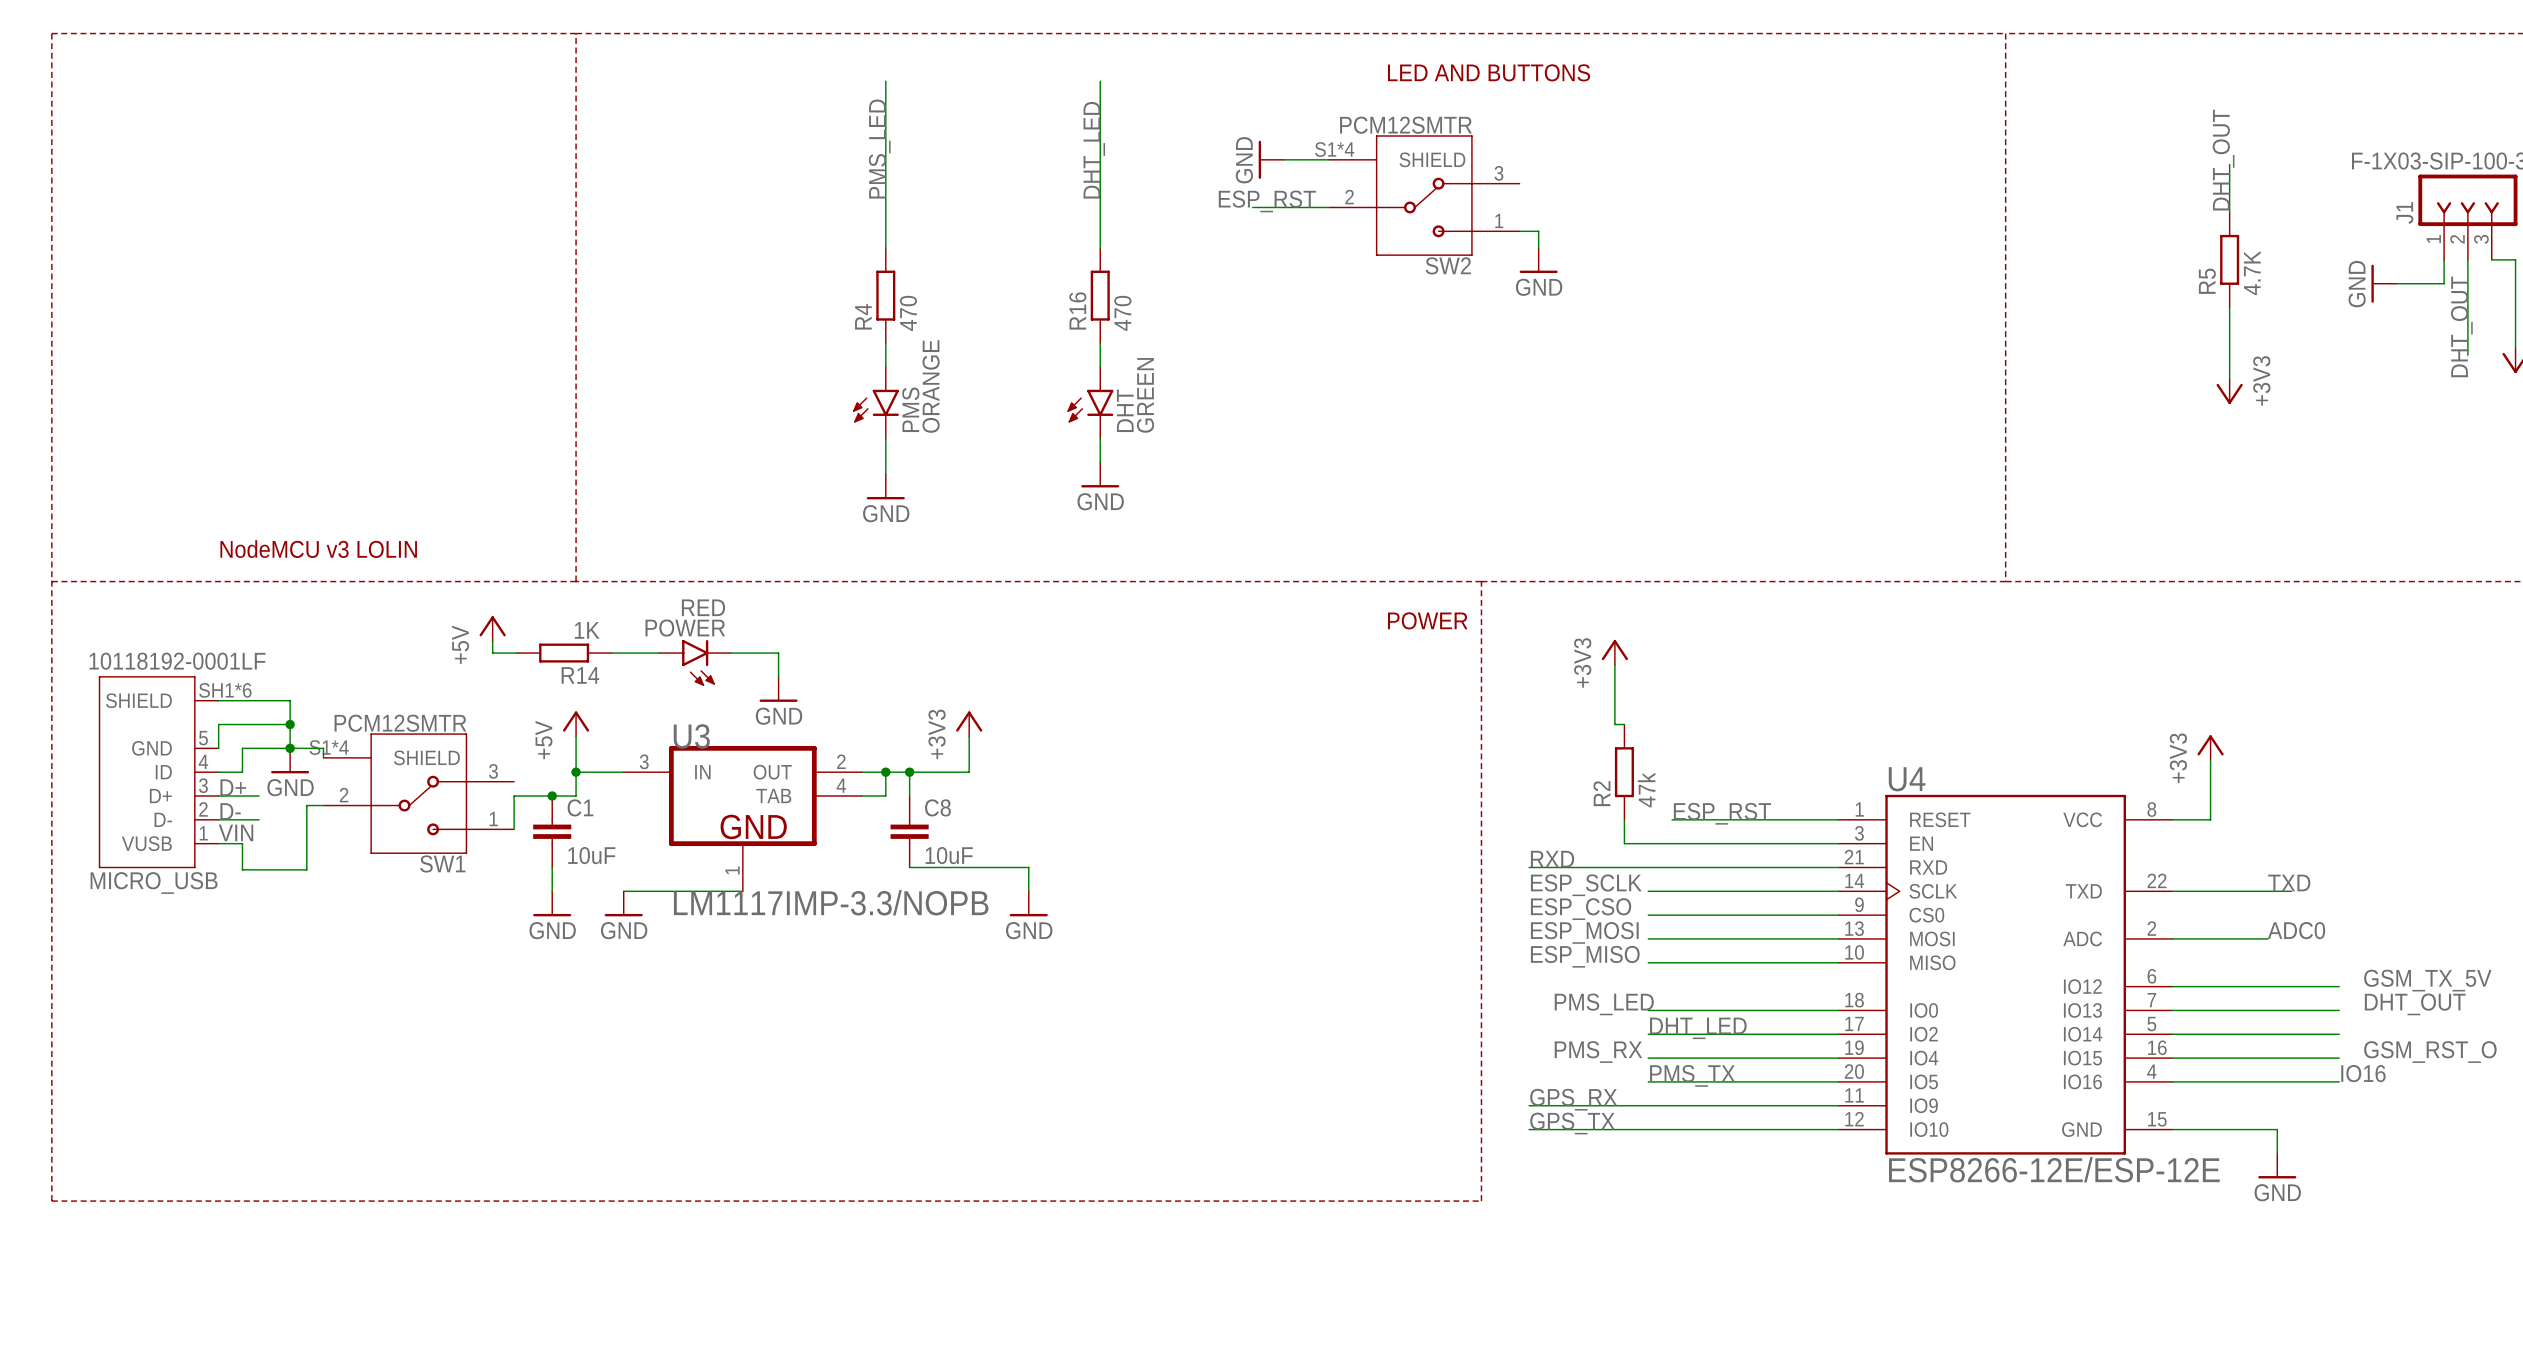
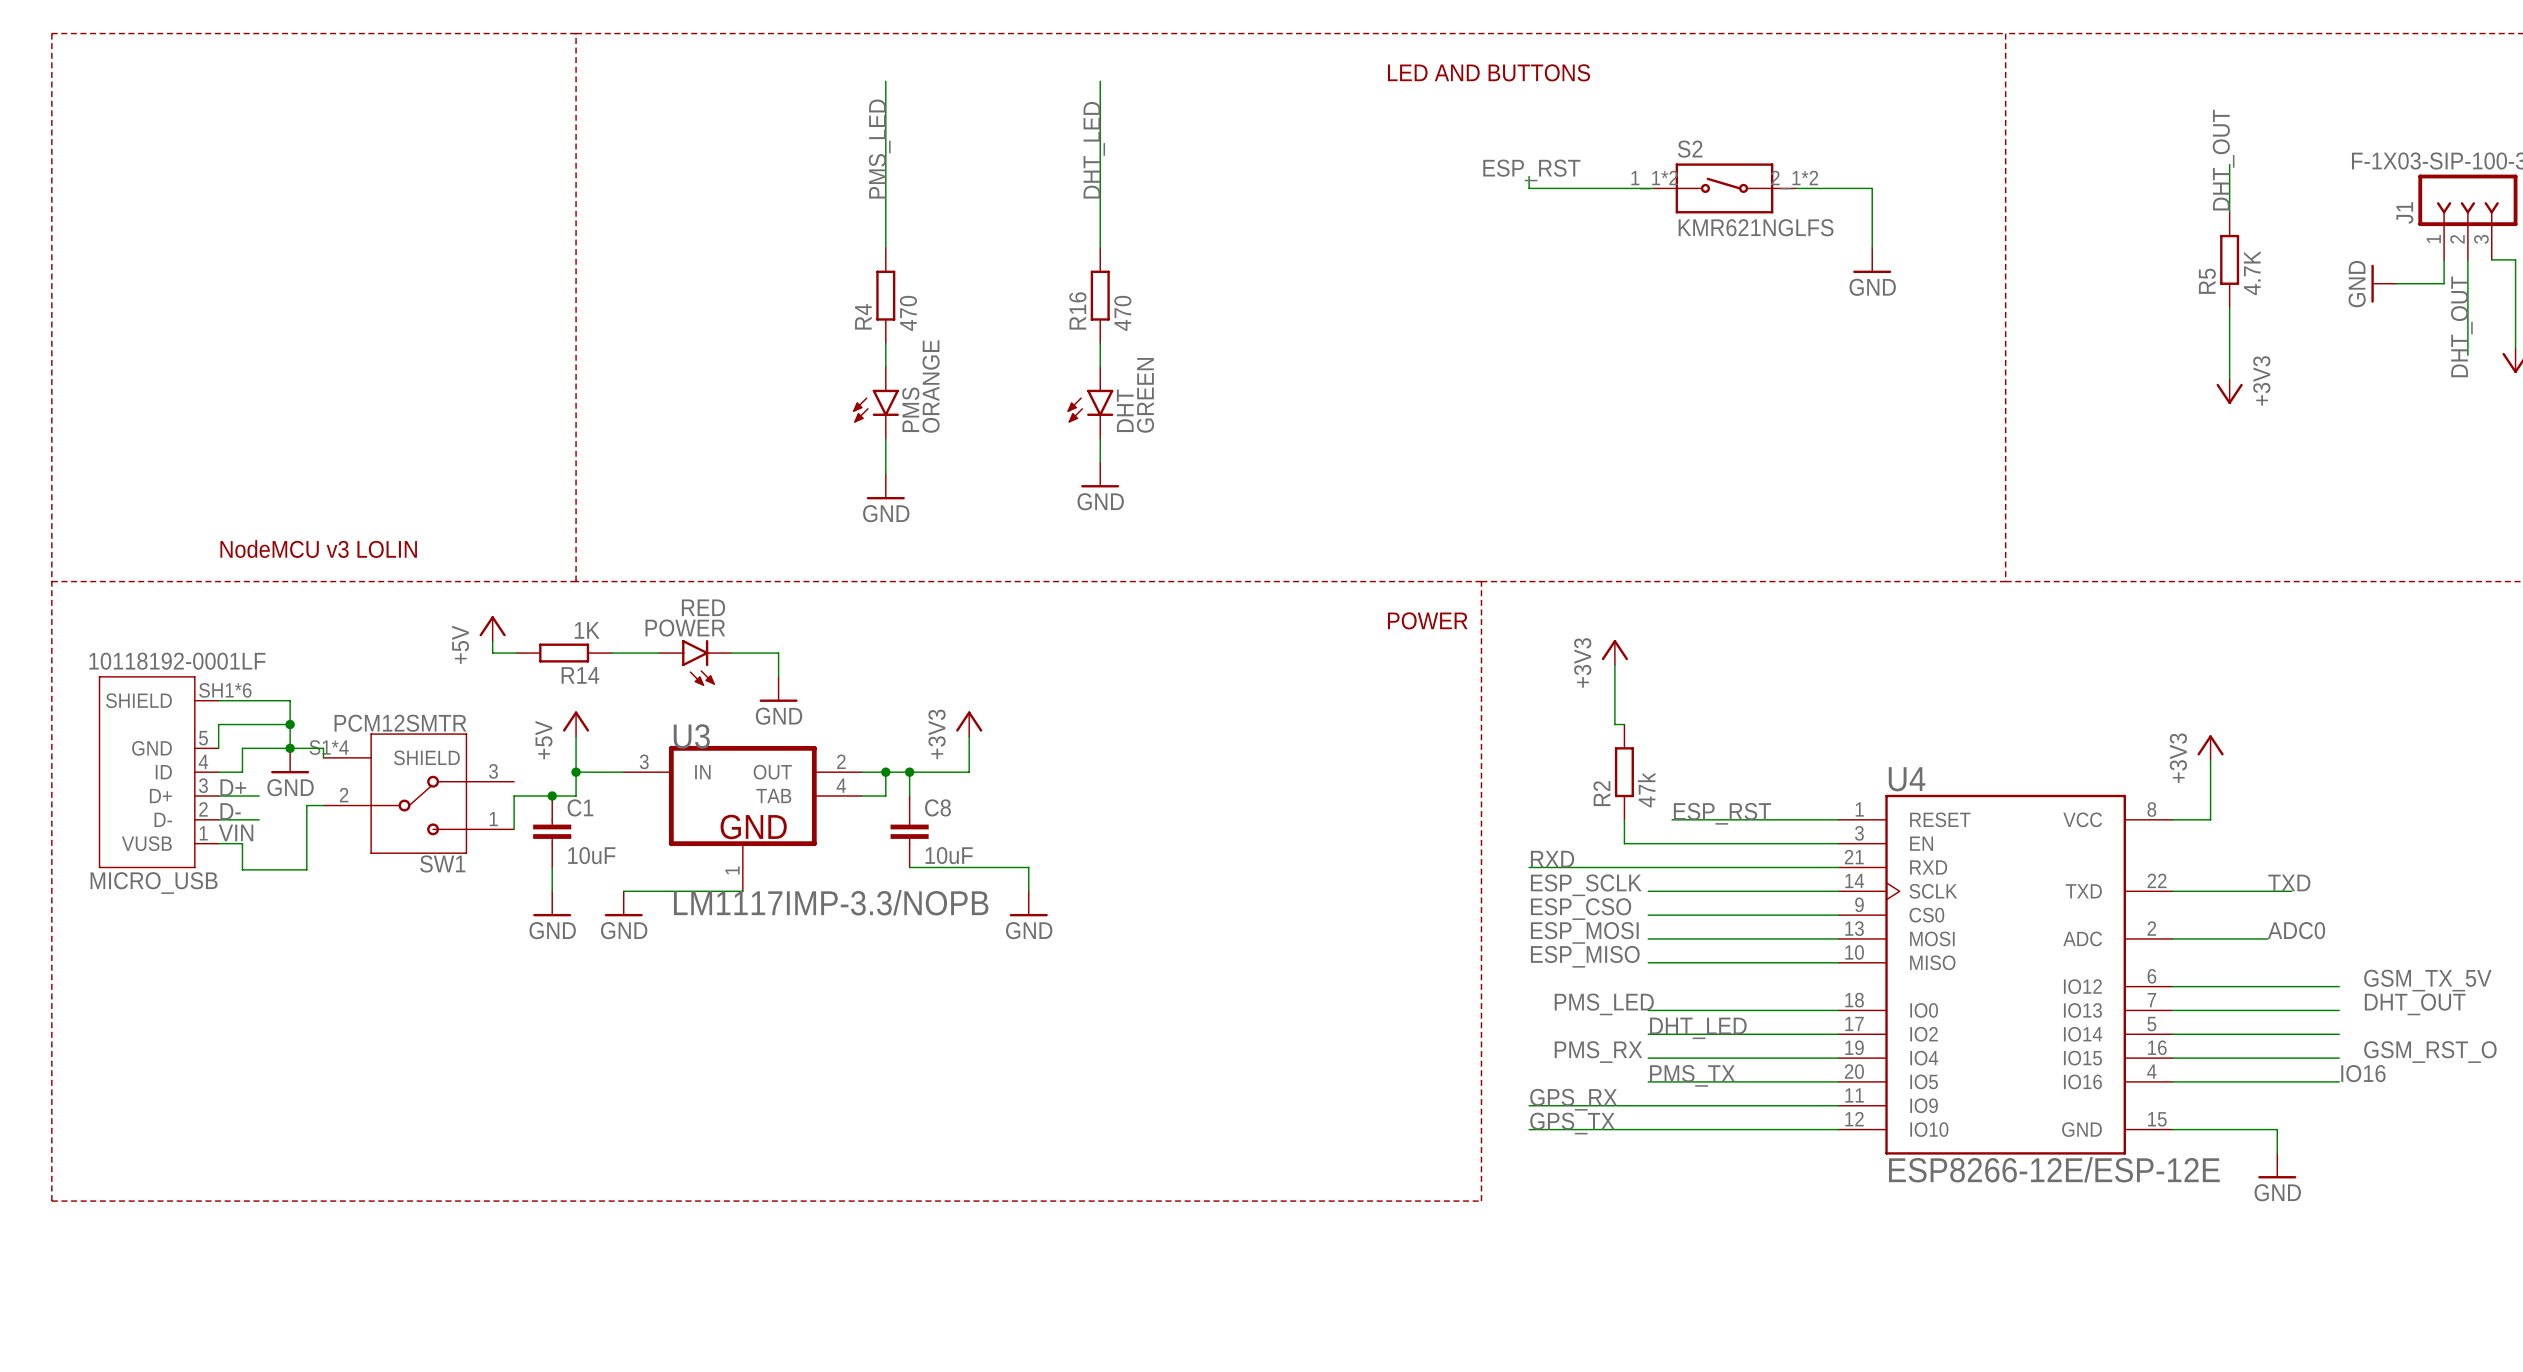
power symbol: GND (1271, 159) -> none
wire: (1283, 159) (1328, 159) -> none
label: none -> ESP_RST (1531, 170)
wire: none -> (1529, 176) (1529, 188) (1653, 188)
S2: none -> KMR621NGLFS (1724, 188)
wire: none -> (1795, 188) (1872, 188) (1872, 247)
SW2: PCM12SMTR (1424, 195) -> none
label: ESP_RST (1267, 201) -> none
wire: (1252, 207) (1328, 207) -> none
wire: (1519, 231) (1538, 231) (1538, 247) -> none
power symbol: GND (1538, 260) -> none
power symbol: none -> GND (1872, 260)

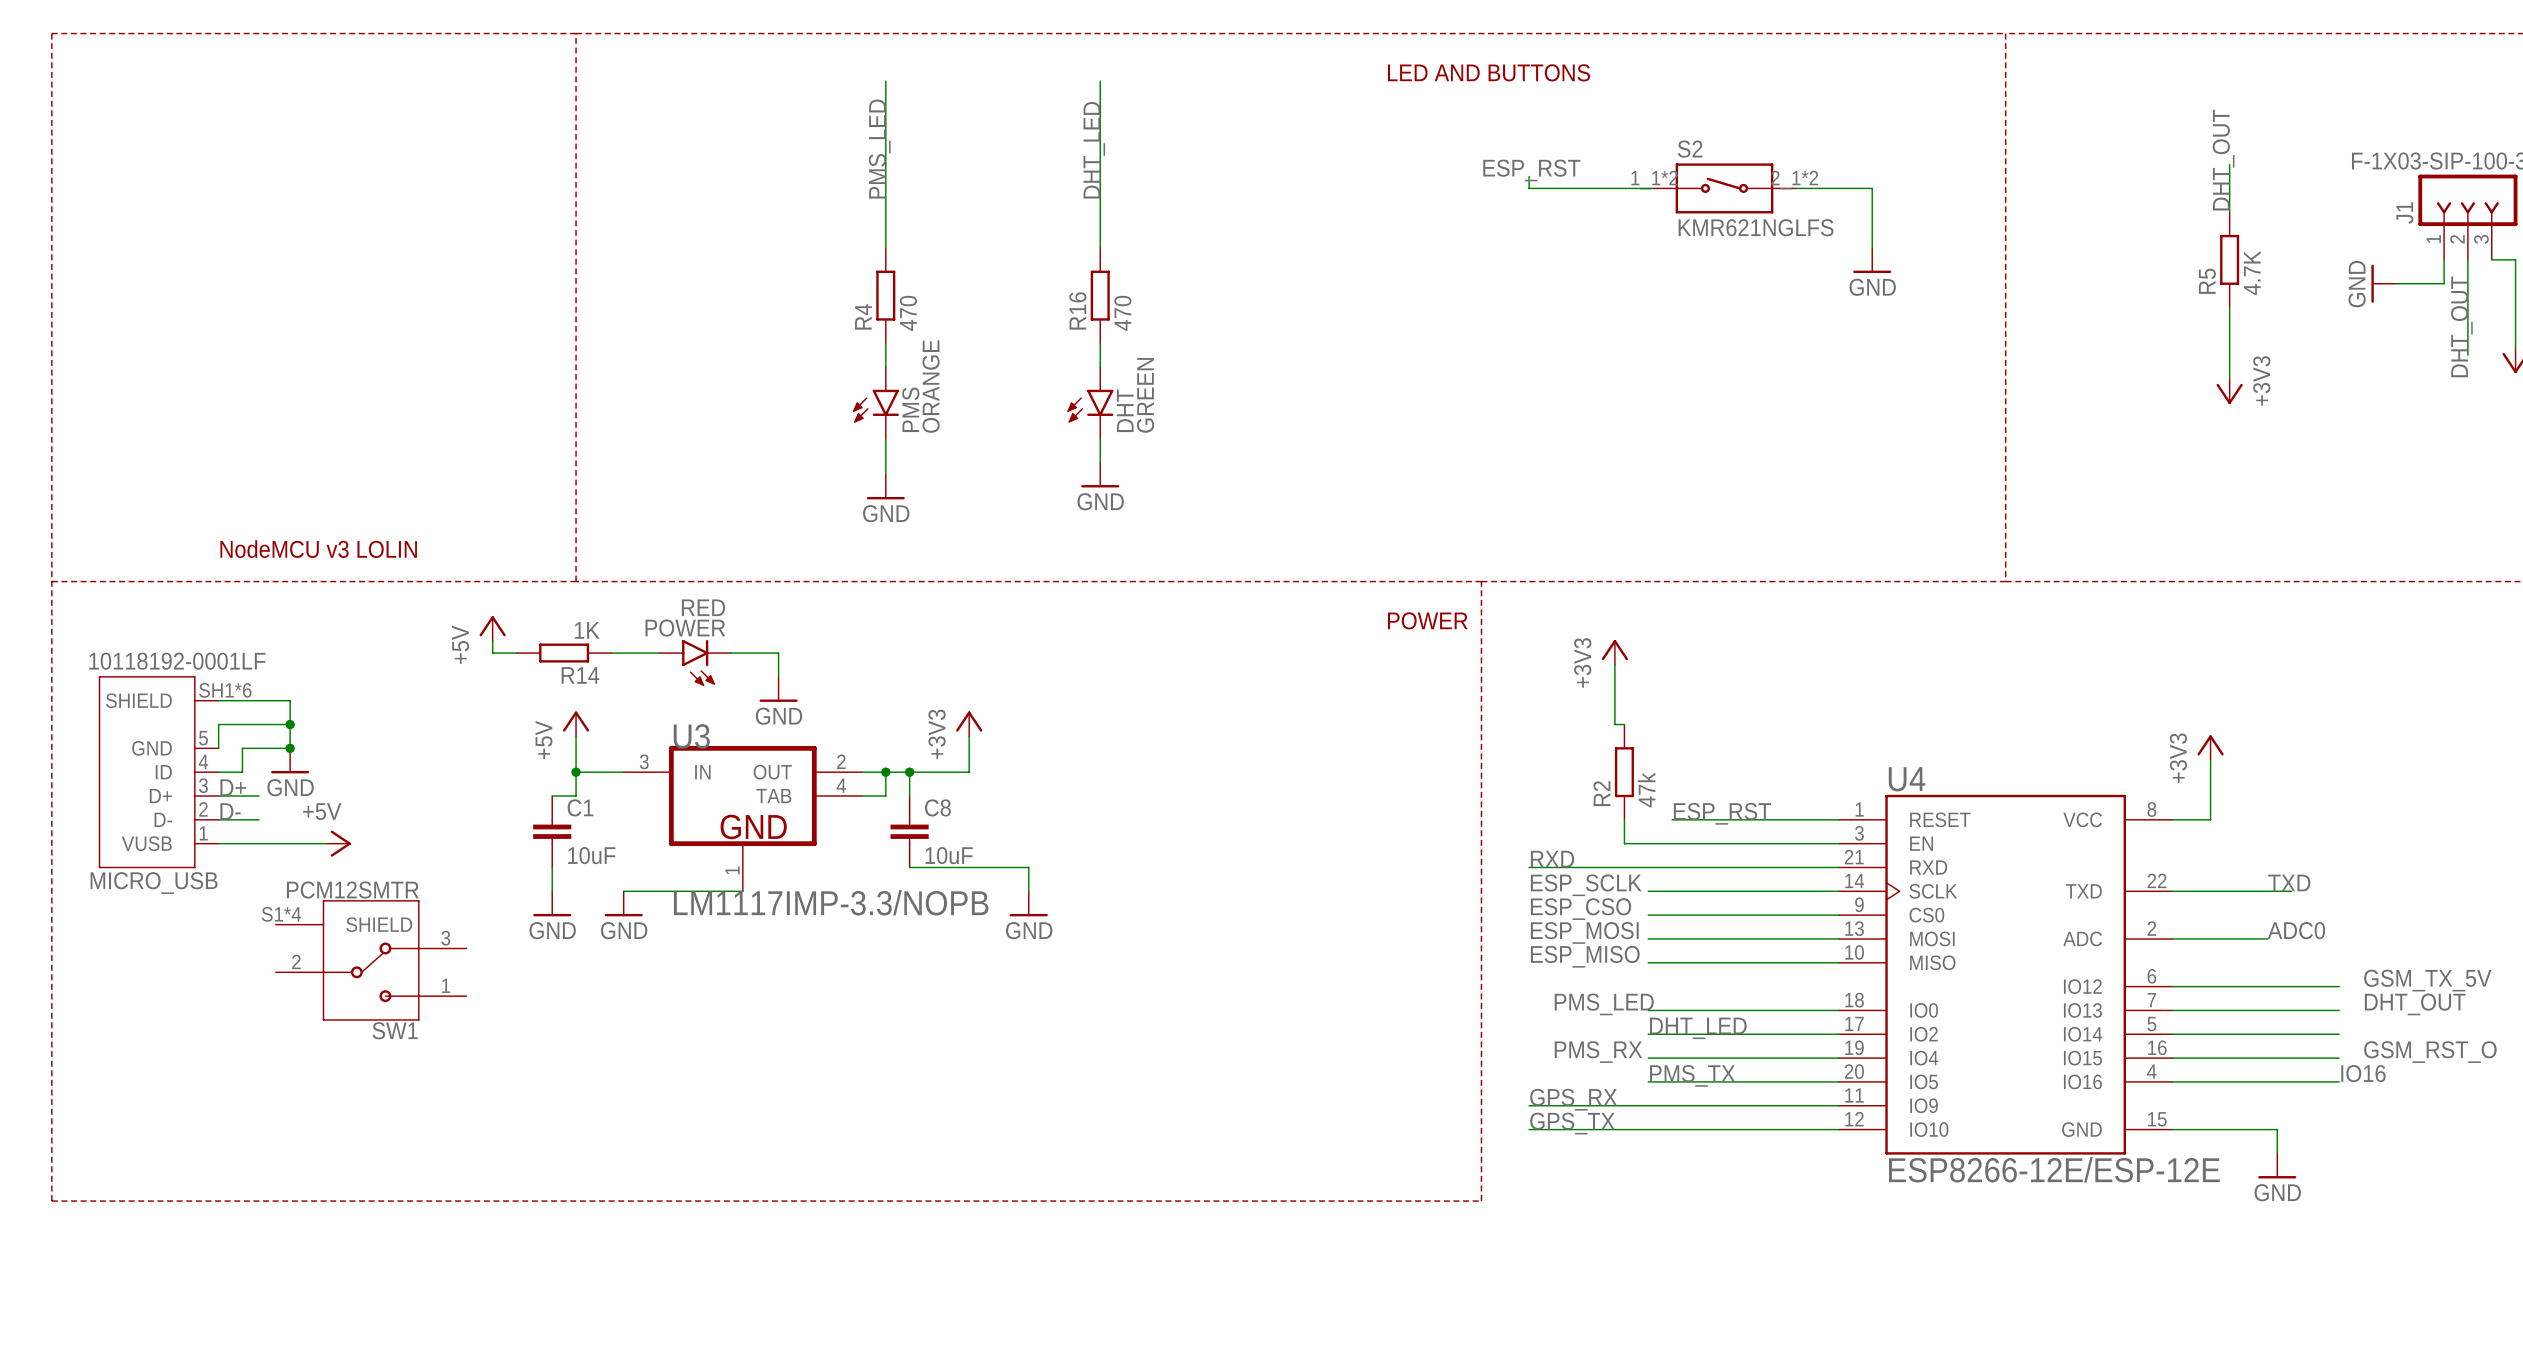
wire: (290, 748) (323, 748) (323, 757) -> none
SW1 position: (418, 793) -> (371, 960)
wire: (552, 796) (514, 796) (514, 829) -> none
junction: (552, 796) -> none
wire: (323, 805) (306, 805) (306, 869) (242, 869) (242, 843) -> (325, 843) (242, 843)
label: VIN (235, 832) -> none
power symbol: none -> +5V (338, 843)

